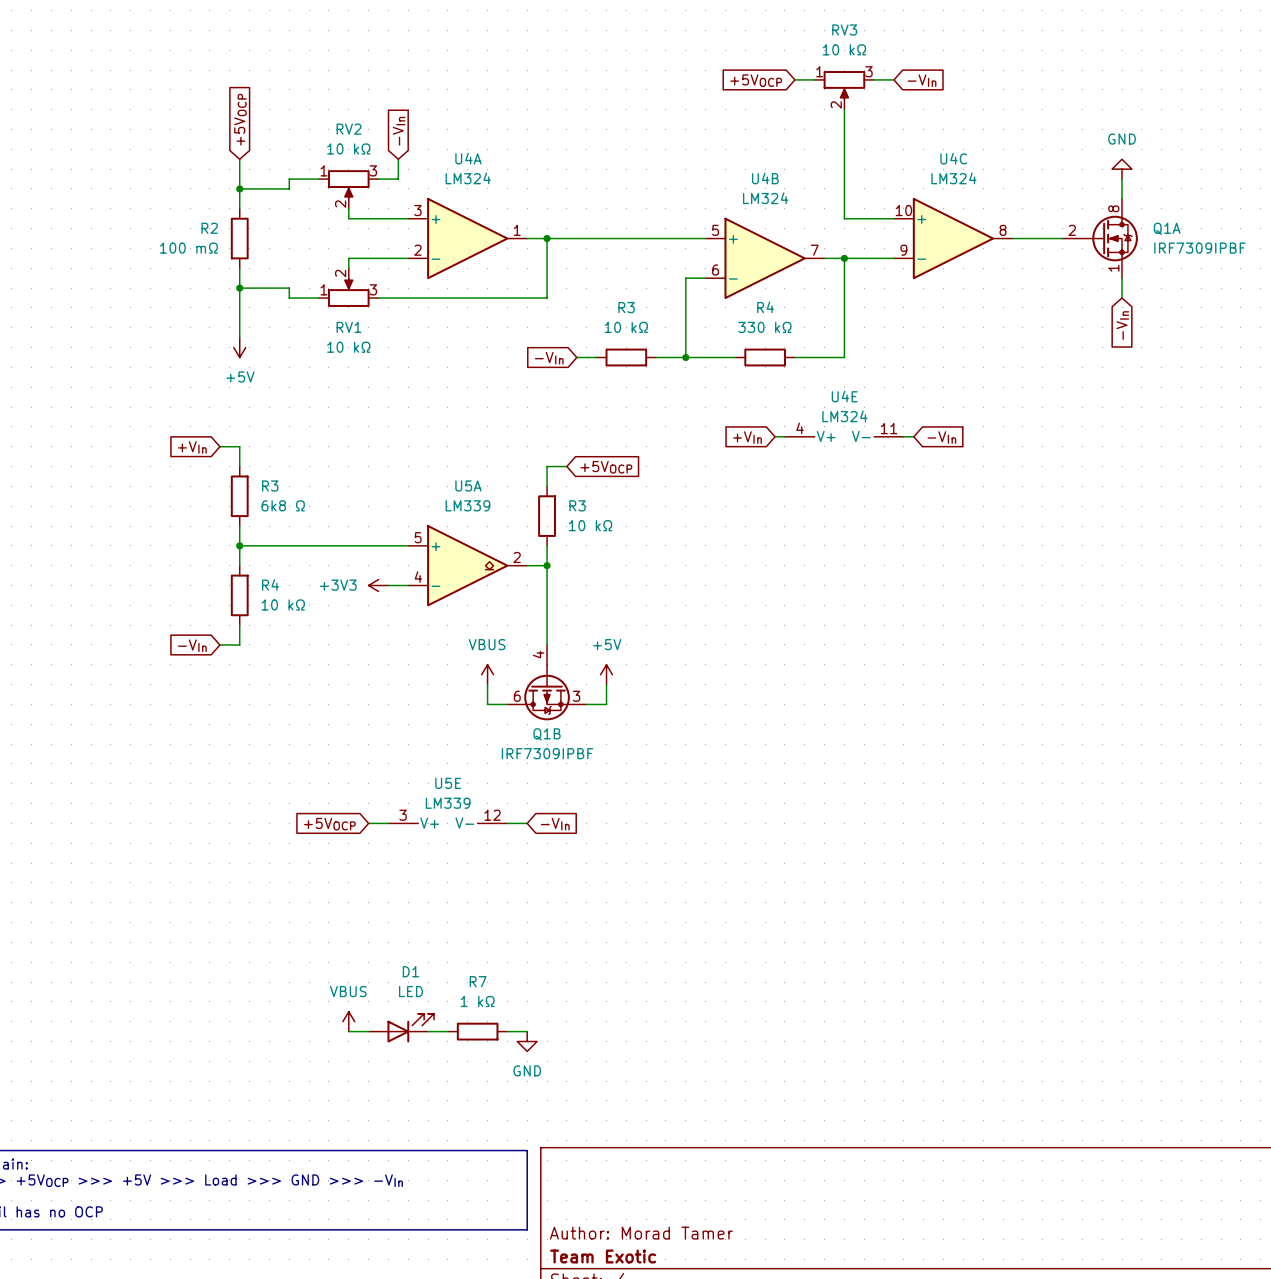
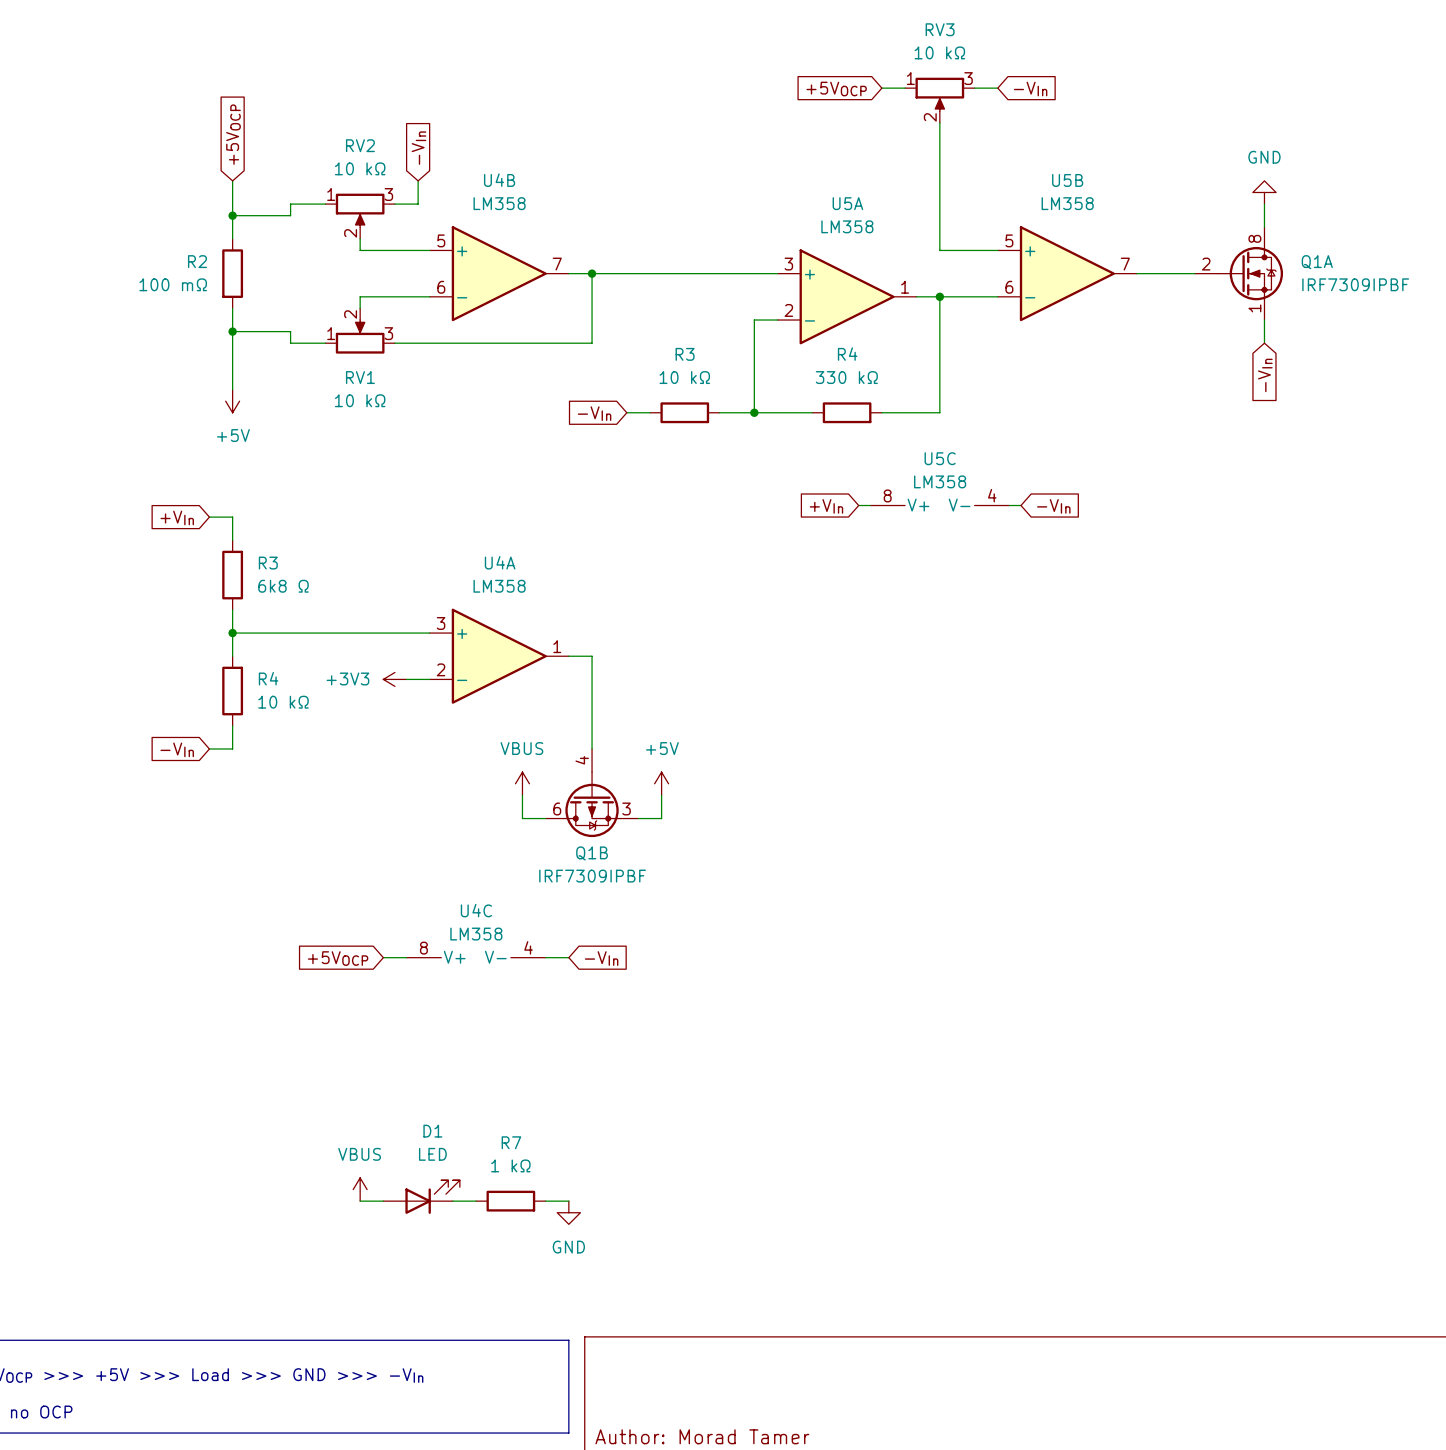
U4C name position: U4C (953, 158) -> U4C (476, 910)
U4A value: LM324 (468, 178) -> LM358 (499, 586)
U4C value: LM324 (953, 178) -> LM358 (476, 934)
U4C symbol: [893, 197, 1013, 280] -> [406, 957, 546, 958]
U4B value: LM324 (765, 198) -> LM358 (499, 203)
U4A position: (467, 238) -> (499, 656)
U5B: none -> LM358 (1067, 273)
U4B position: (765, 258) -> (499, 273)
U4E name: U4E (844, 396) -> U5C (940, 458)
U4E value: LM324 (844, 416) -> LM358 (940, 481)
U4E pin number: 4 (800, 428) -> 8 (887, 495)
U4E pin number: 11 (889, 428) -> 4 (992, 495)
wire: (566, 466) (547, 466) (547, 486) -> none
global label: +5VOCP (606, 467) -> none
U5A value: LM339 (467, 505) -> LM358 (847, 226)
R3: 10 kΩ (547, 516) -> none
U5A symbol: [408, 525, 528, 607] -> [777, 249, 917, 345]
wire: (547, 545) (547, 565) -> none
junction: (547, 565) -> none
U5E: LM339 (447, 823) -> none

